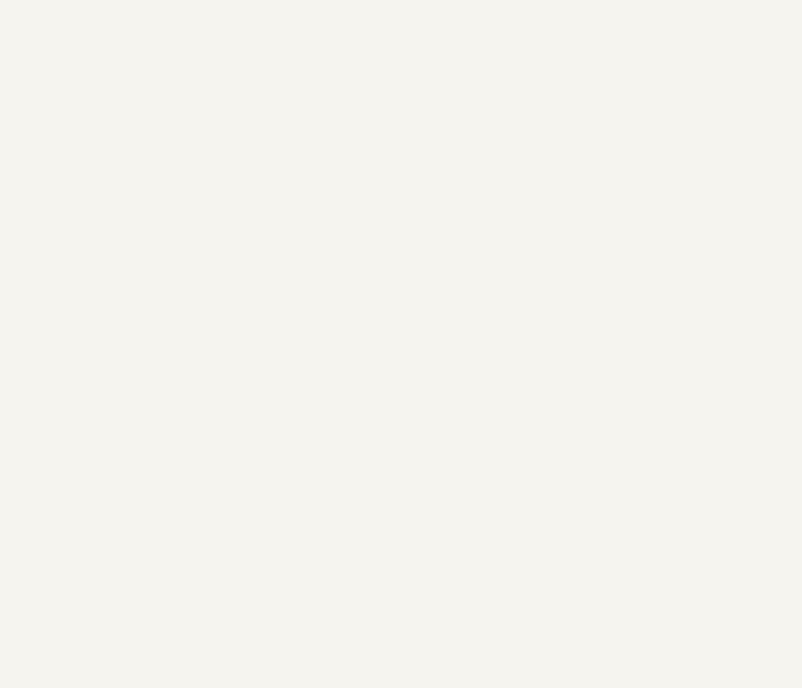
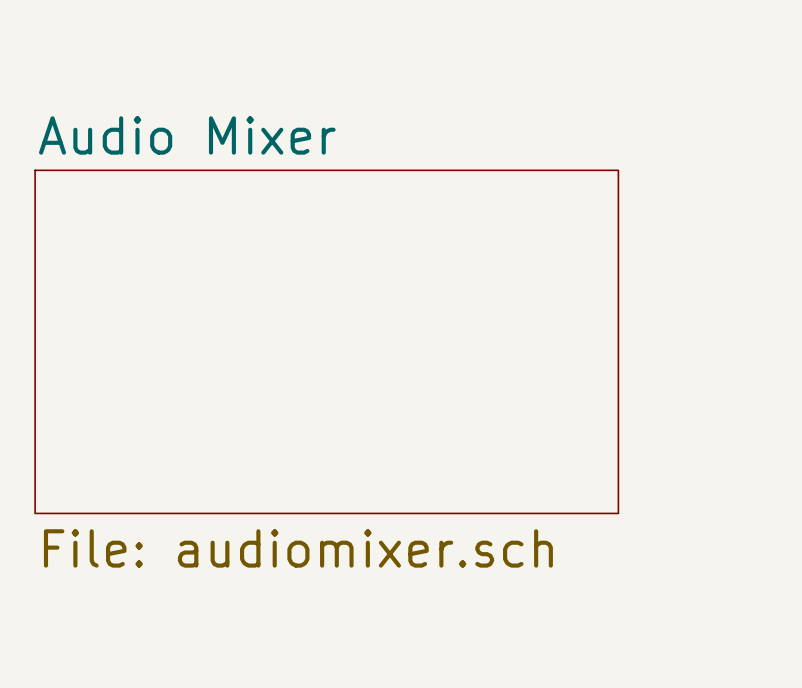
sheet Audio Mixer: none -> File: audiomixer.sch (326, 341)

